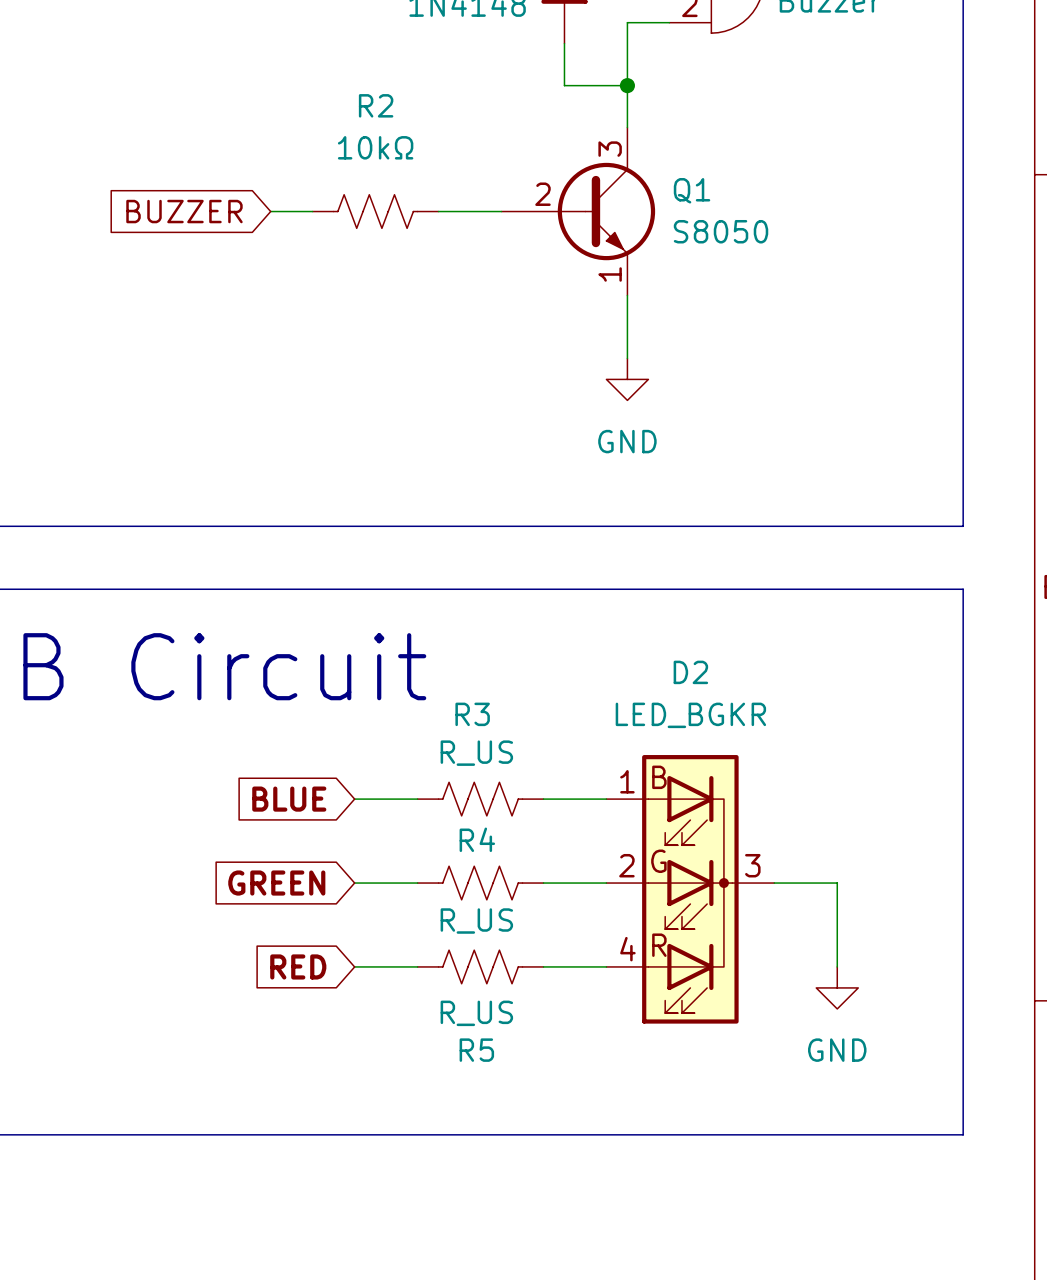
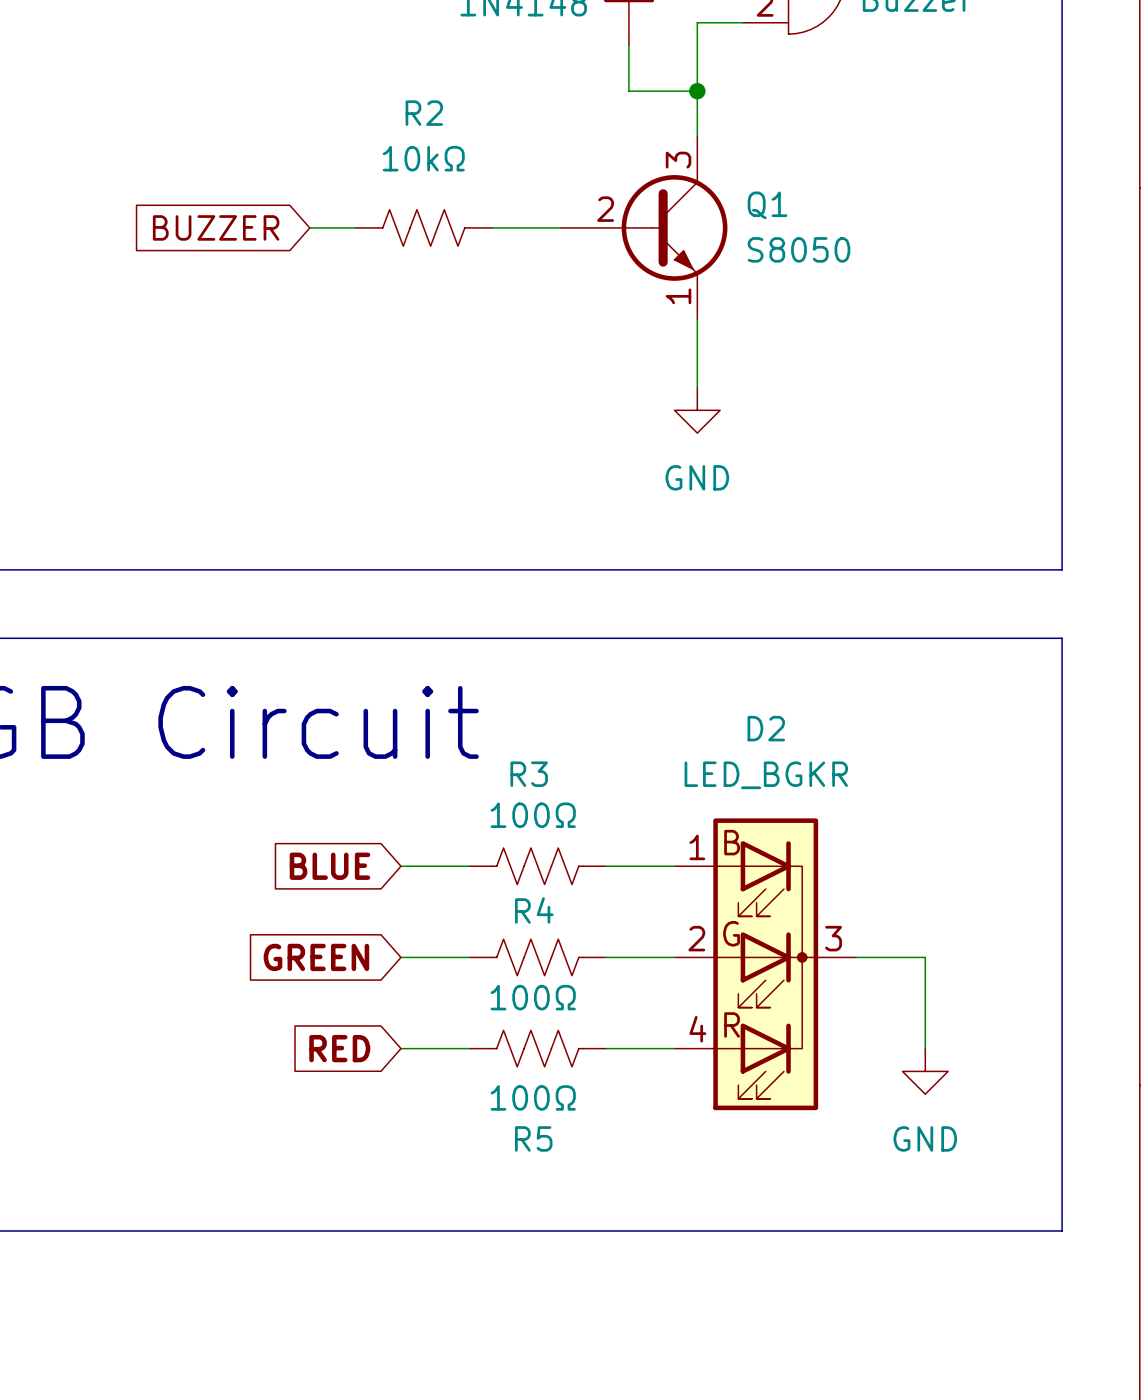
R3 value: R_US (476, 753) -> 100Ω (533, 815)
R4 value: R_US (476, 921) -> 100Ω (533, 997)
R5 value: R_US (476, 1013) -> 100Ω (533, 1097)

